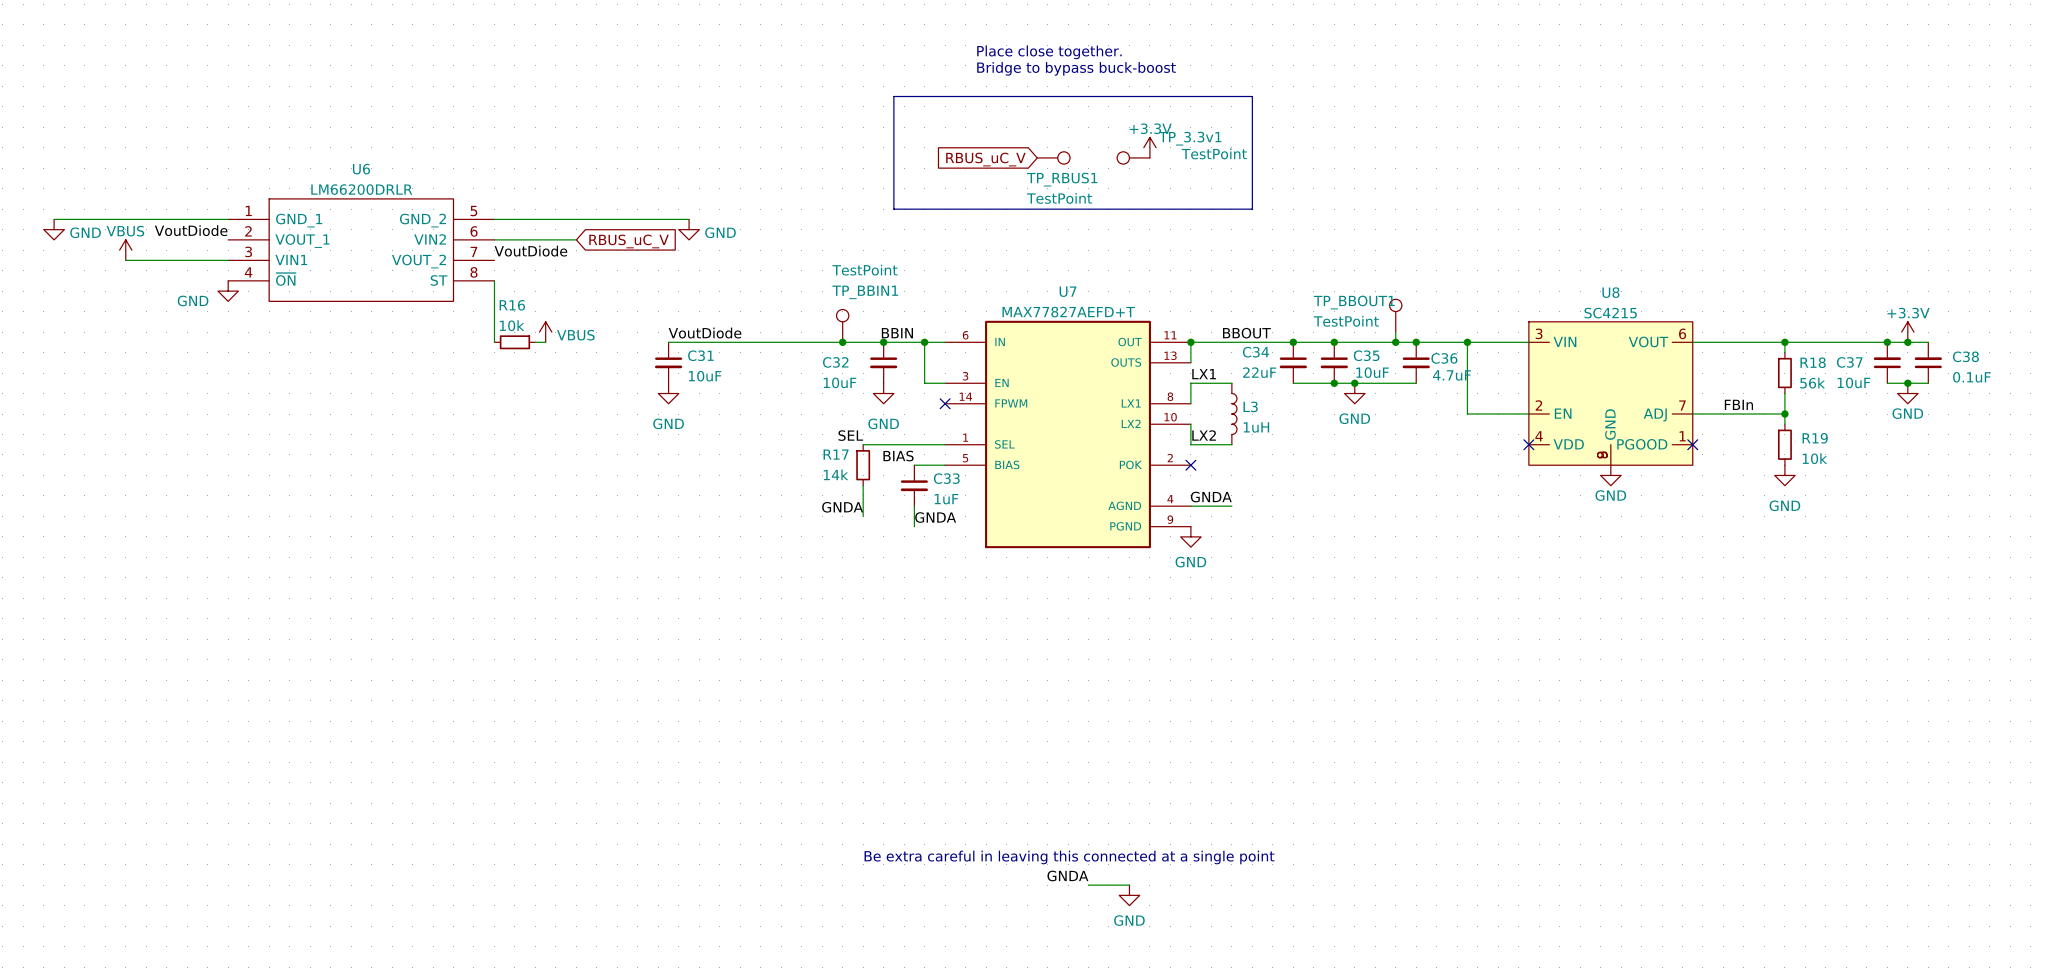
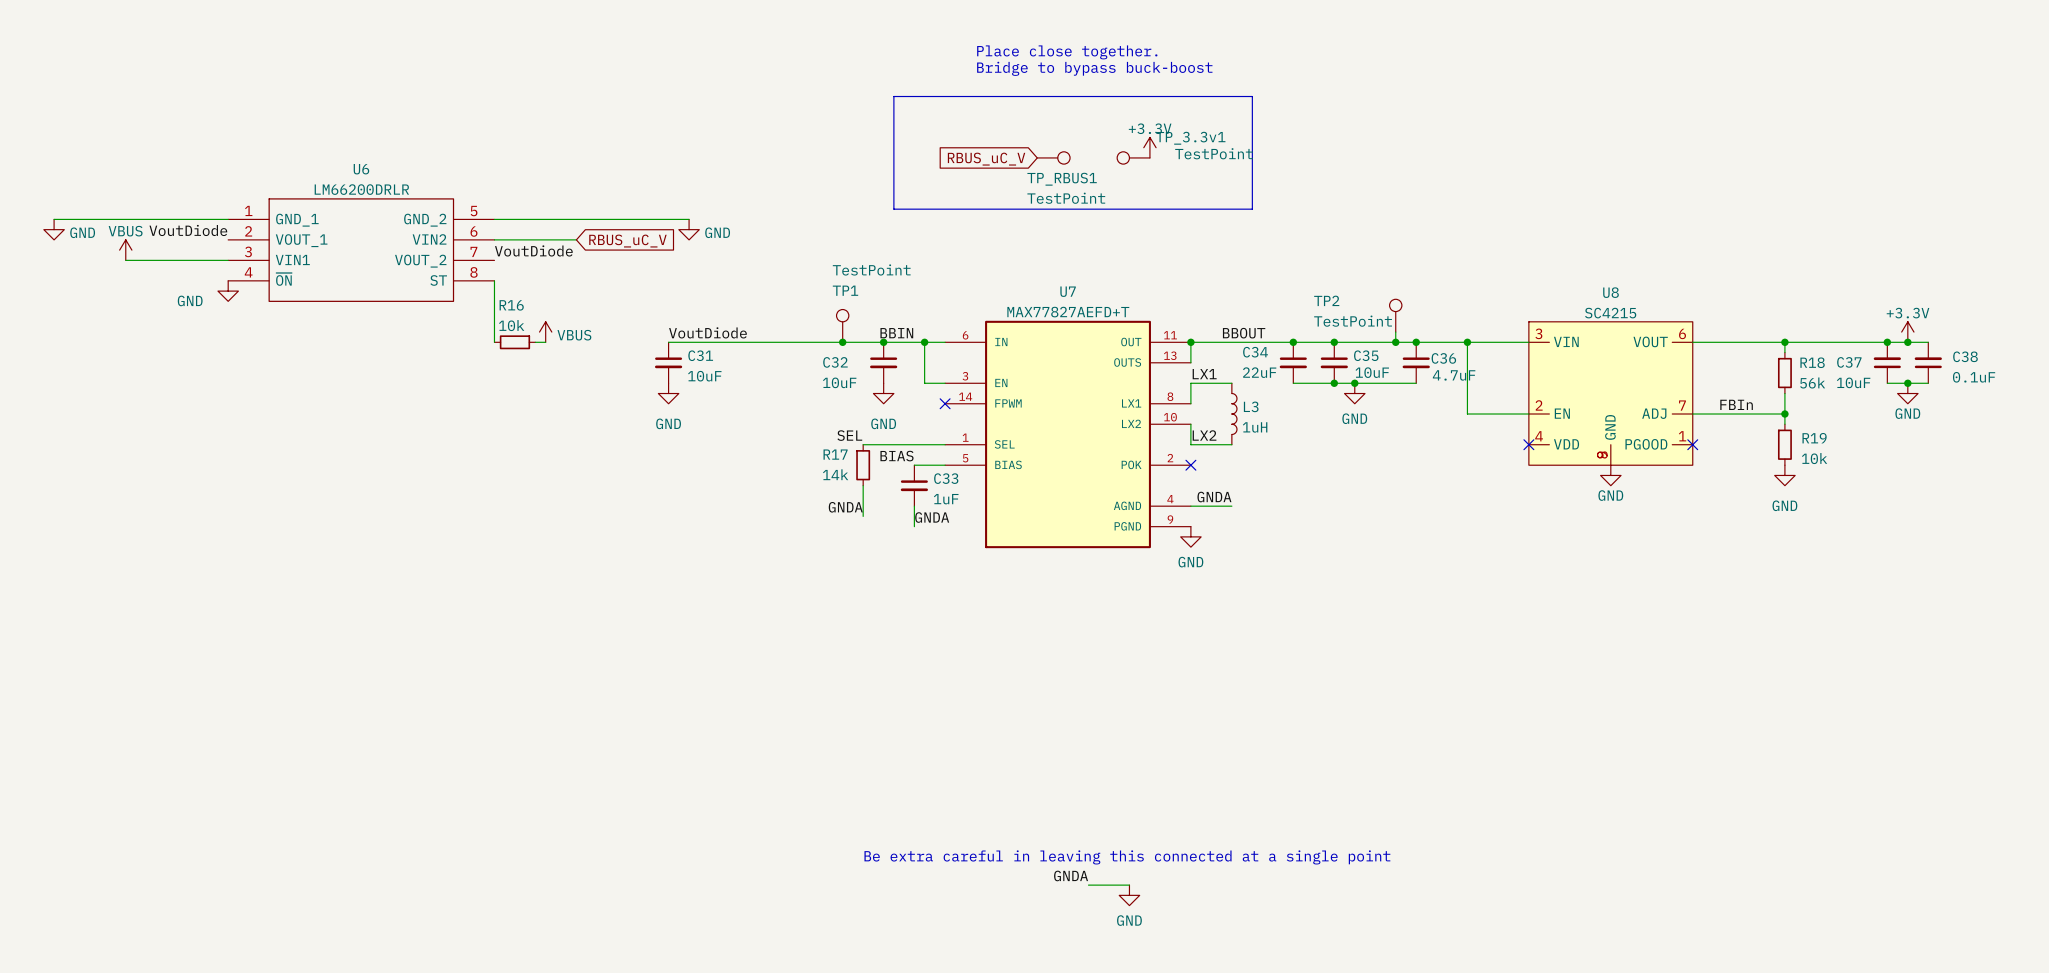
TP_BBIN1 name: TP_BBIN1 (865, 292) -> TP1 (845, 290)
TP_BBOUT1 name: TP_BBOUT1 (1354, 302) -> TP2 (1326, 300)

